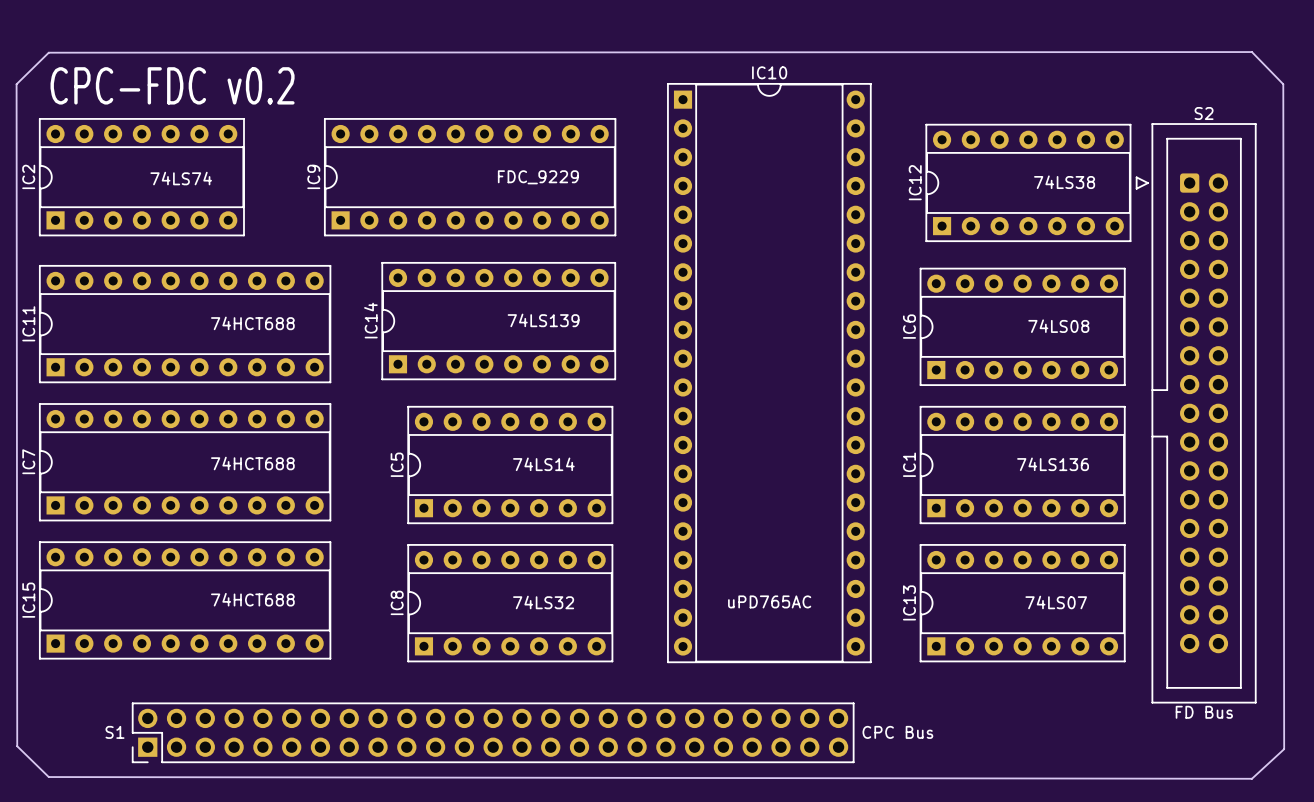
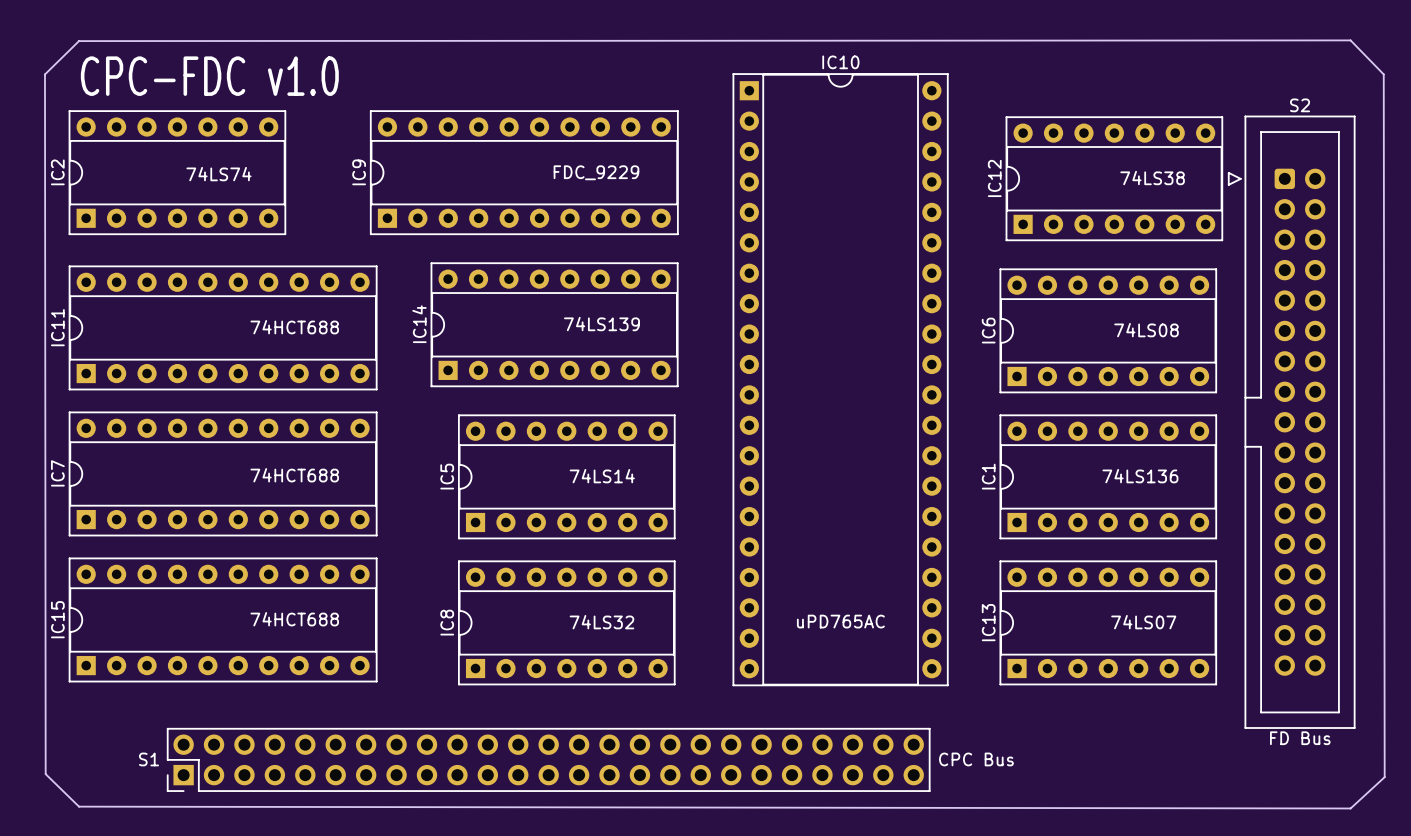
text: CPC-FDC v0.2 (172, 85) -> CPC-FDC v1.0 (209, 76)

